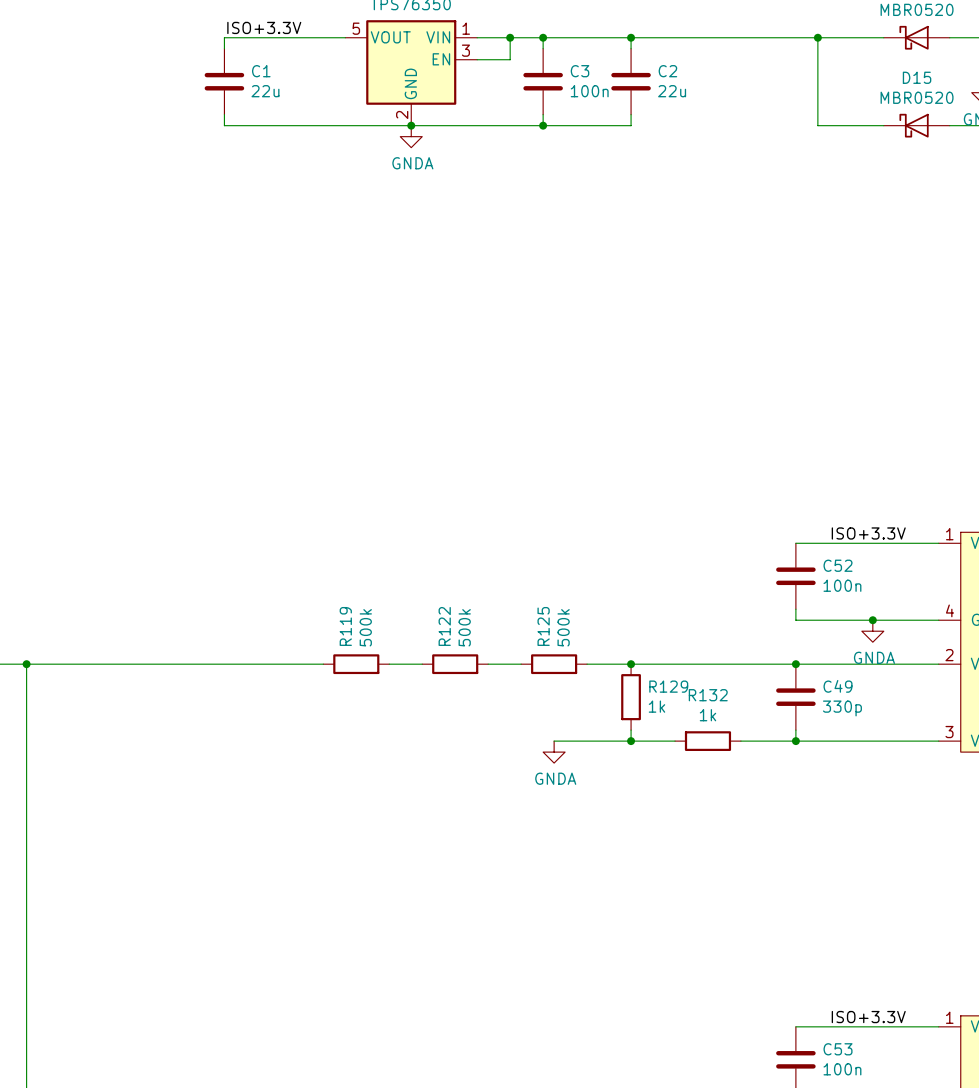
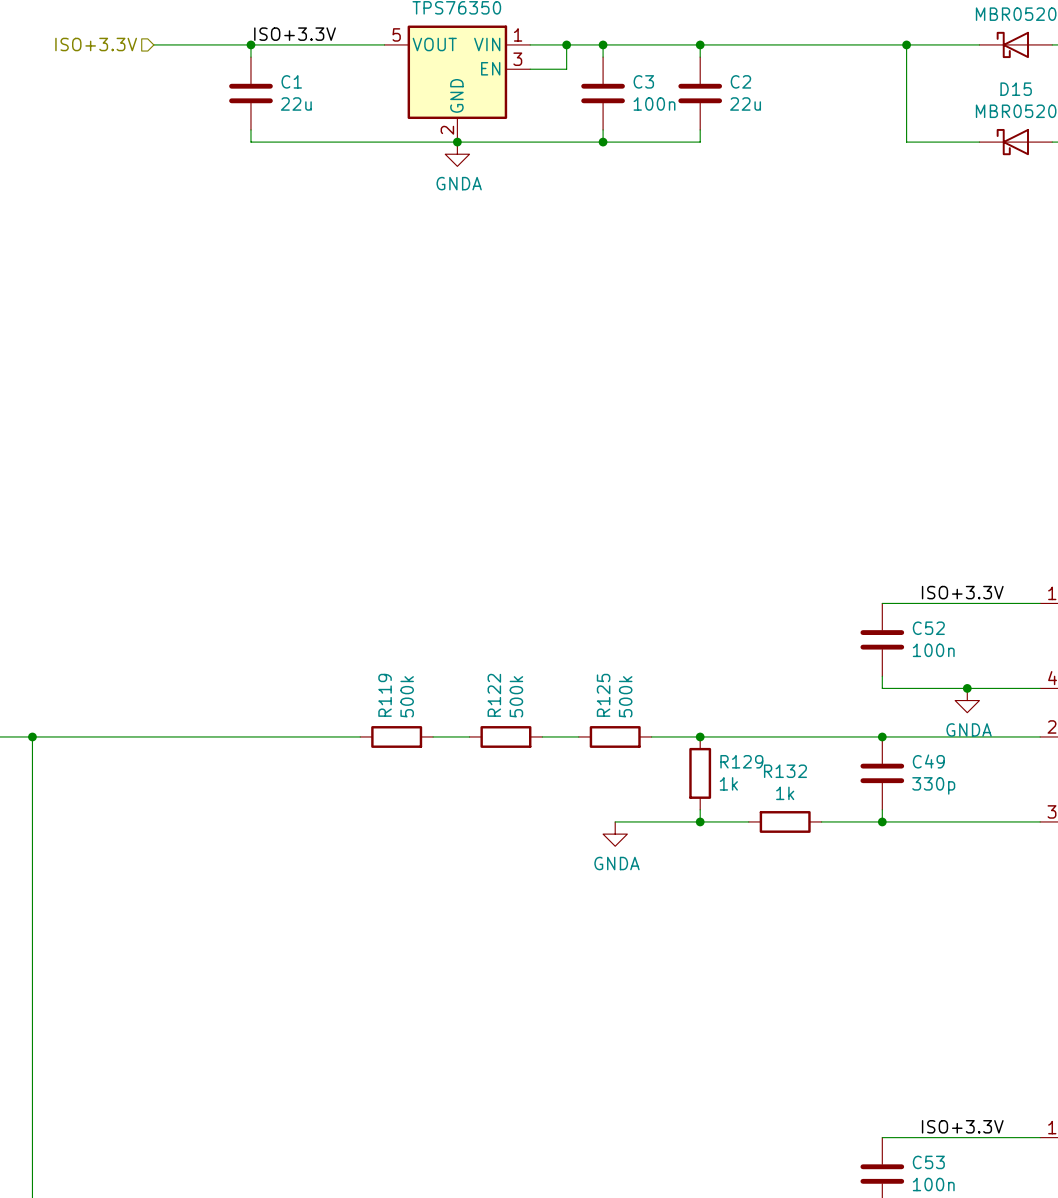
hierarchical label: none -> ISO+3.3V (96, 44)
wire: none -> (153, 44) (250, 44)
junction: none -> (250, 44)

